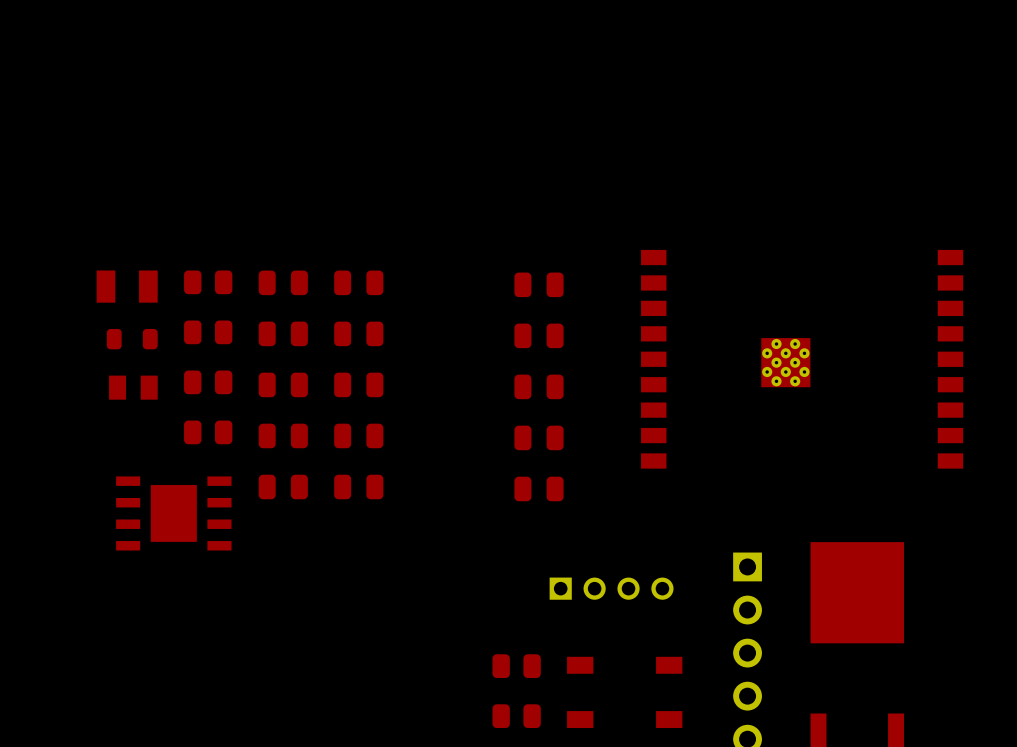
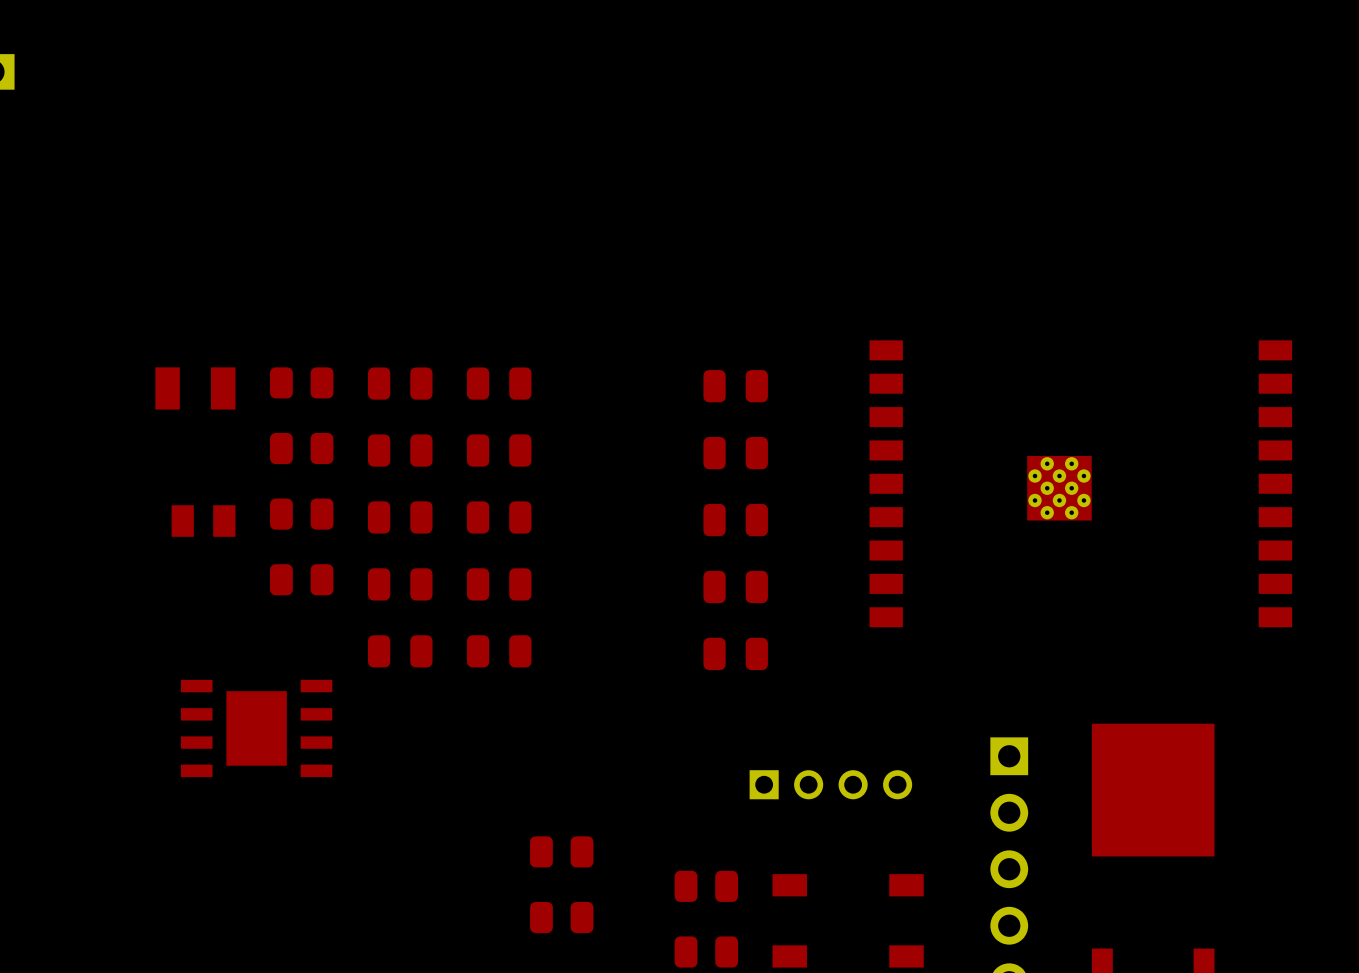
part: (132, 339) -> none
part position: (173, 513) -> (256, 728)
part: none -> (561, 851)
part: none -> (561, 917)

